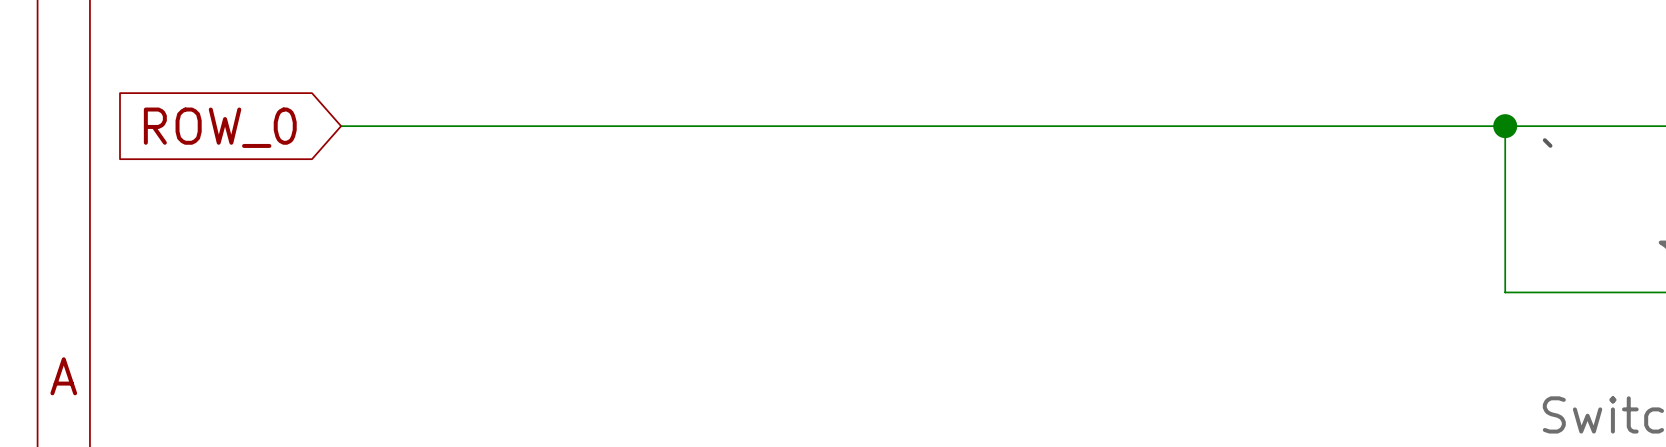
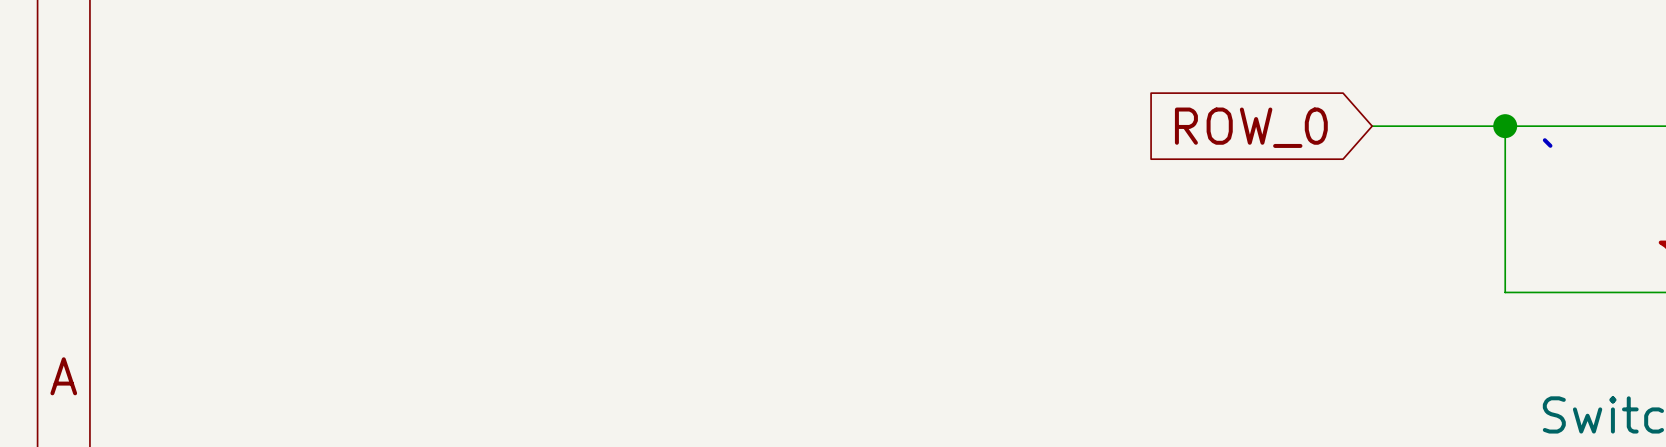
wire: (341, 126) (1372, 126) -> none
global label: ROW_0 (220, 127) -> none
global label: none -> ROW_0 (1251, 127)

